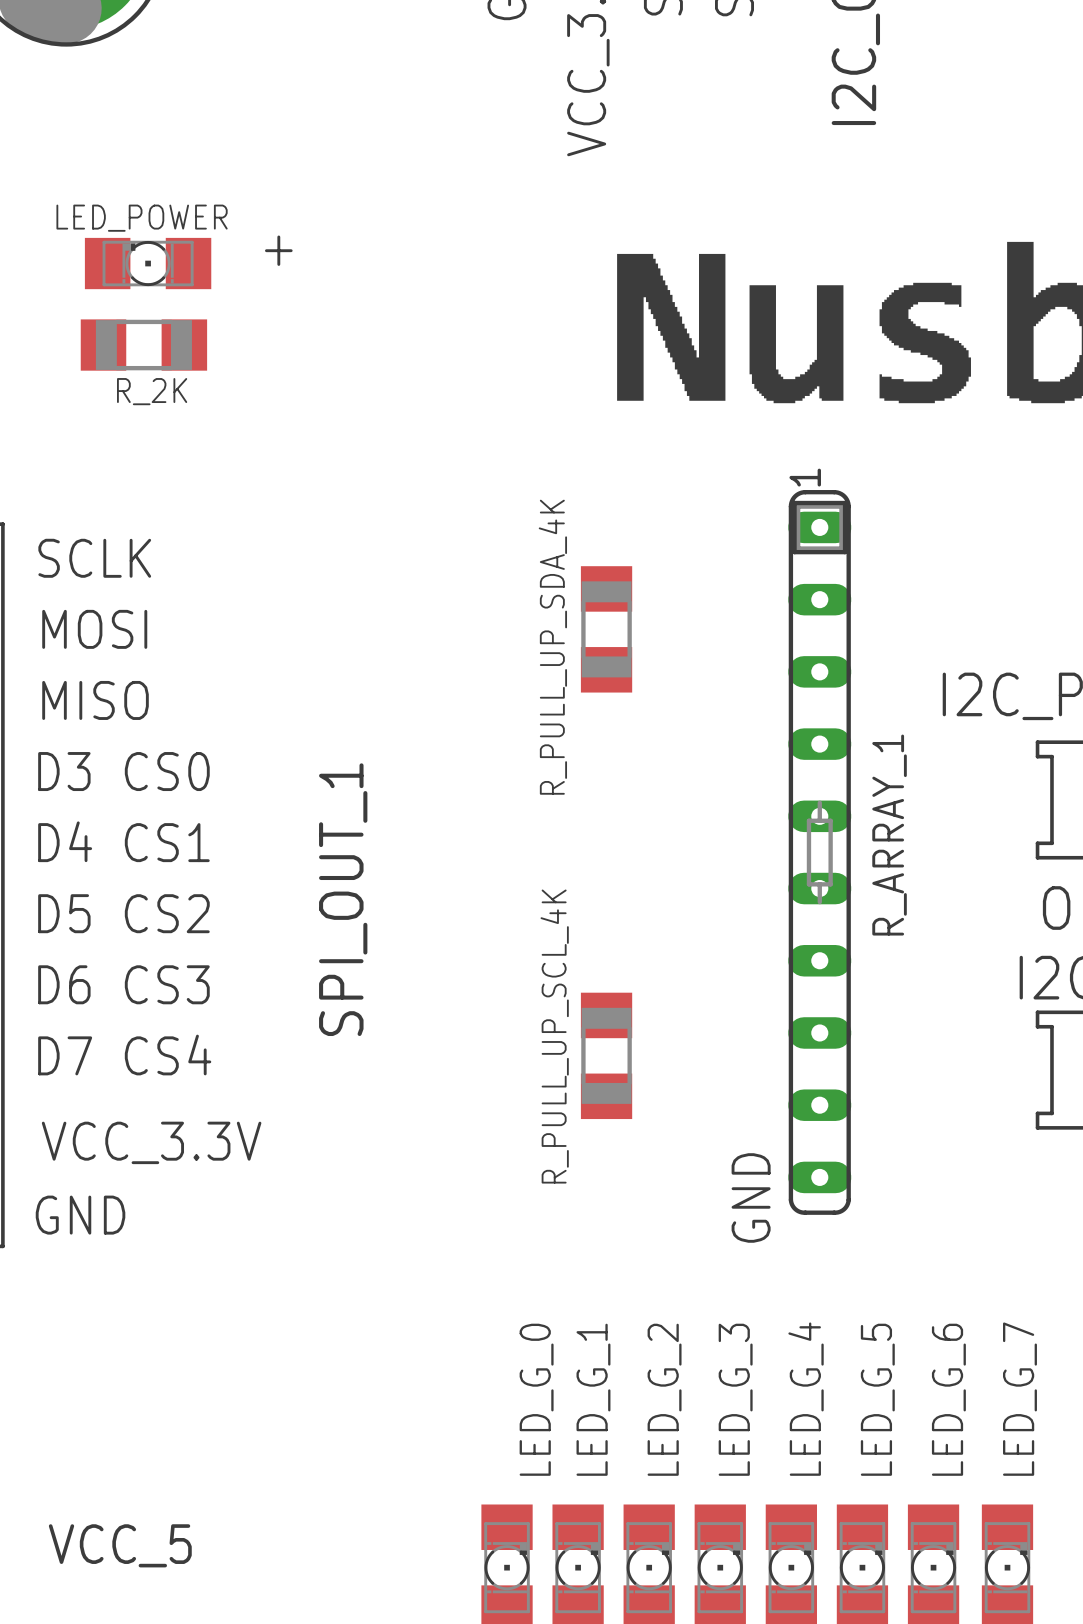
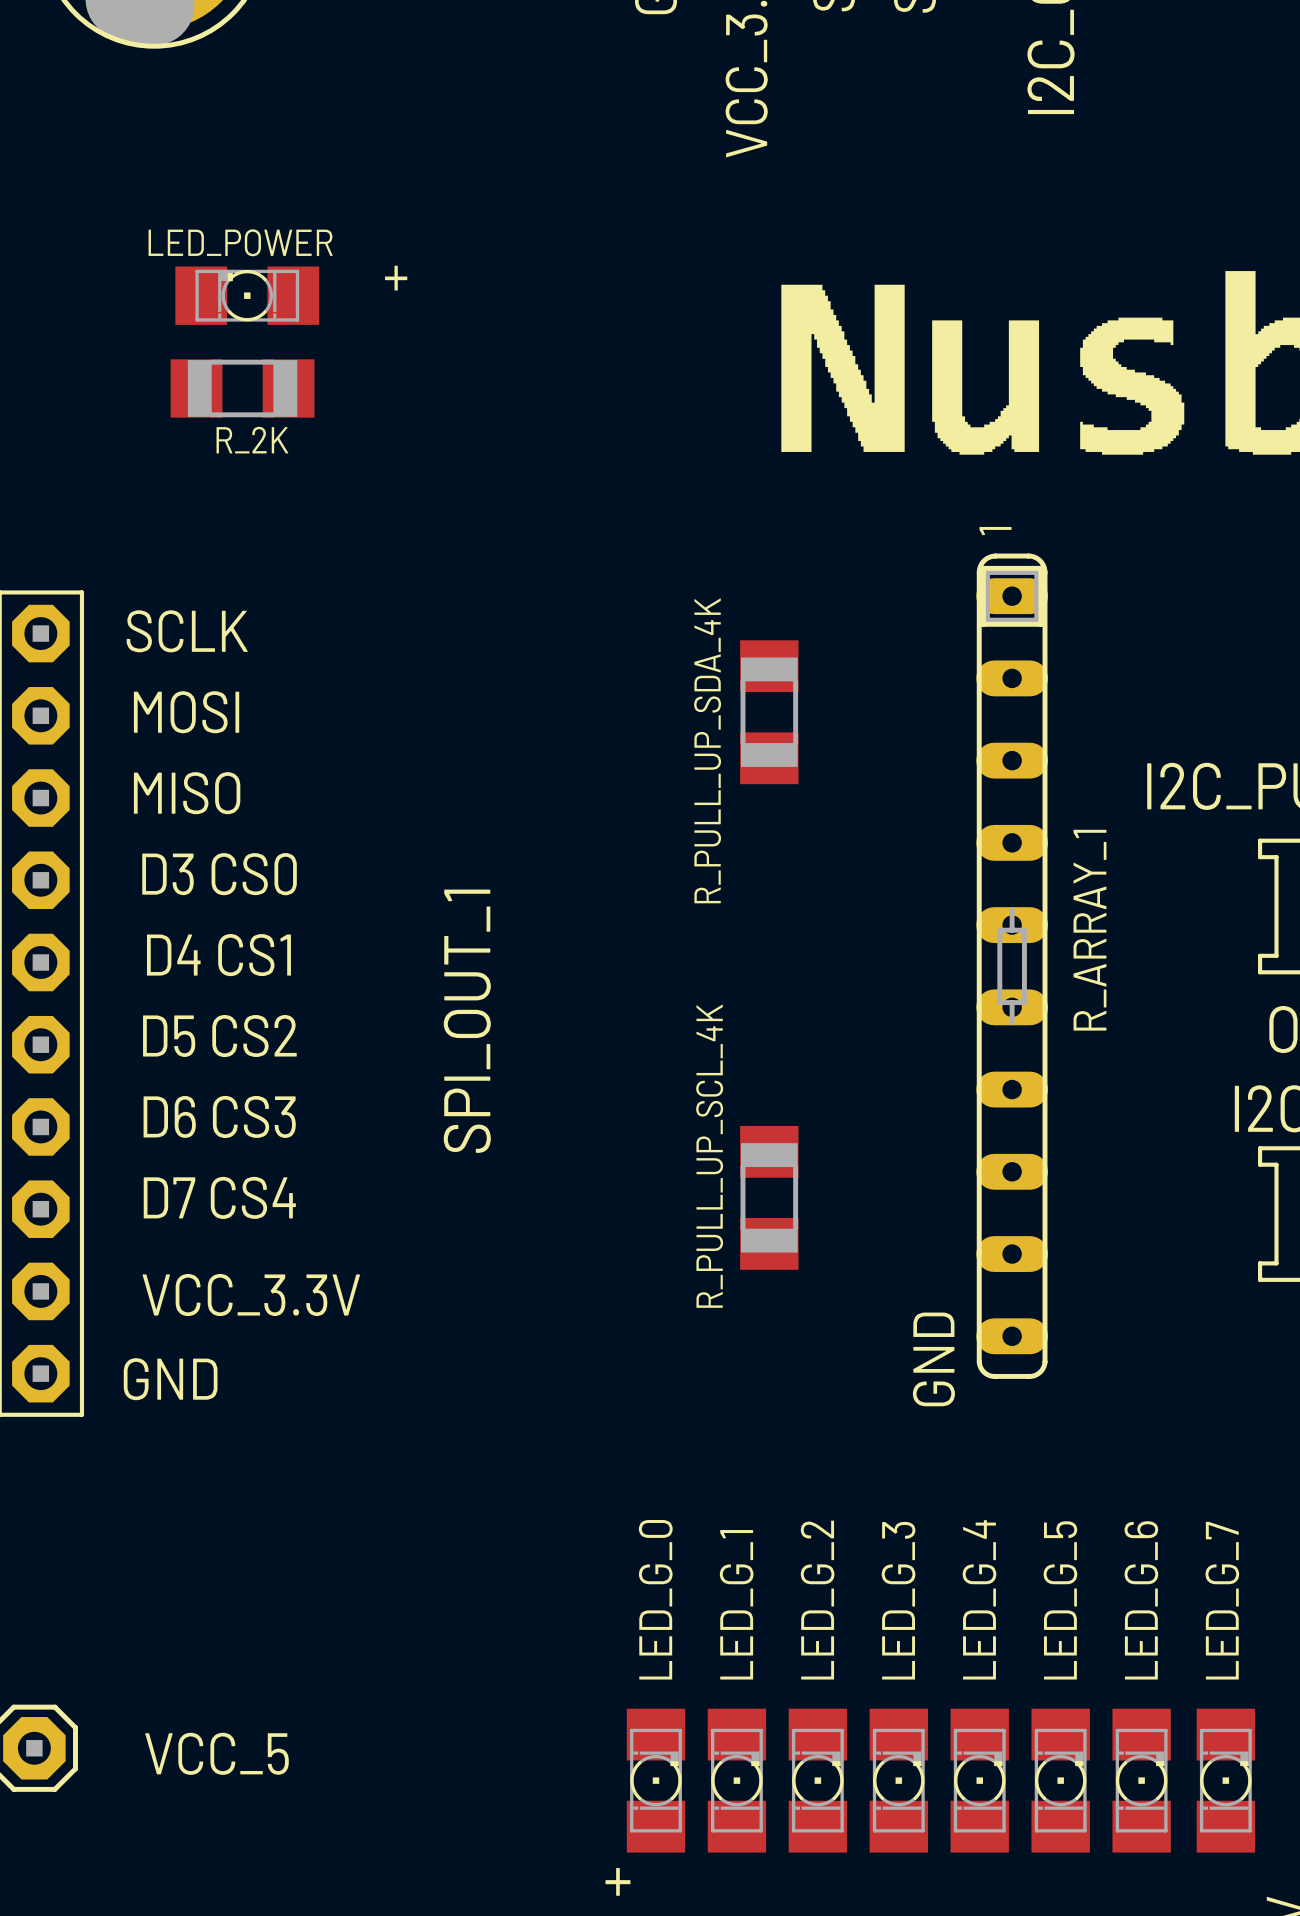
LED_G_0 name position: LED_G_0 (536, 1399) -> LED_G_0 (655, 1599)
LED_G_1 name position: LED_G_1 (593, 1399) -> LED_G_1 (736, 1604)
LED_G_2 name position: LED_G_2 (664, 1399) -> LED_G_2 (817, 1600)
LED_G_3 name position: LED_G_3 (735, 1399) -> LED_G_3 (898, 1600)
LED_G_4 name position: LED_G_4 (806, 1399) -> LED_G_4 (979, 1599)
LED_G_5 name position: LED_G_5 (877, 1399) -> LED_G_5 (1060, 1600)
LED_G_6 name position: LED_G_6 (948, 1399) -> LED_G_6 (1141, 1600)
LED_G_7 name position: LED_G_7 (1019, 1399) -> LED_G_7 (1222, 1600)

